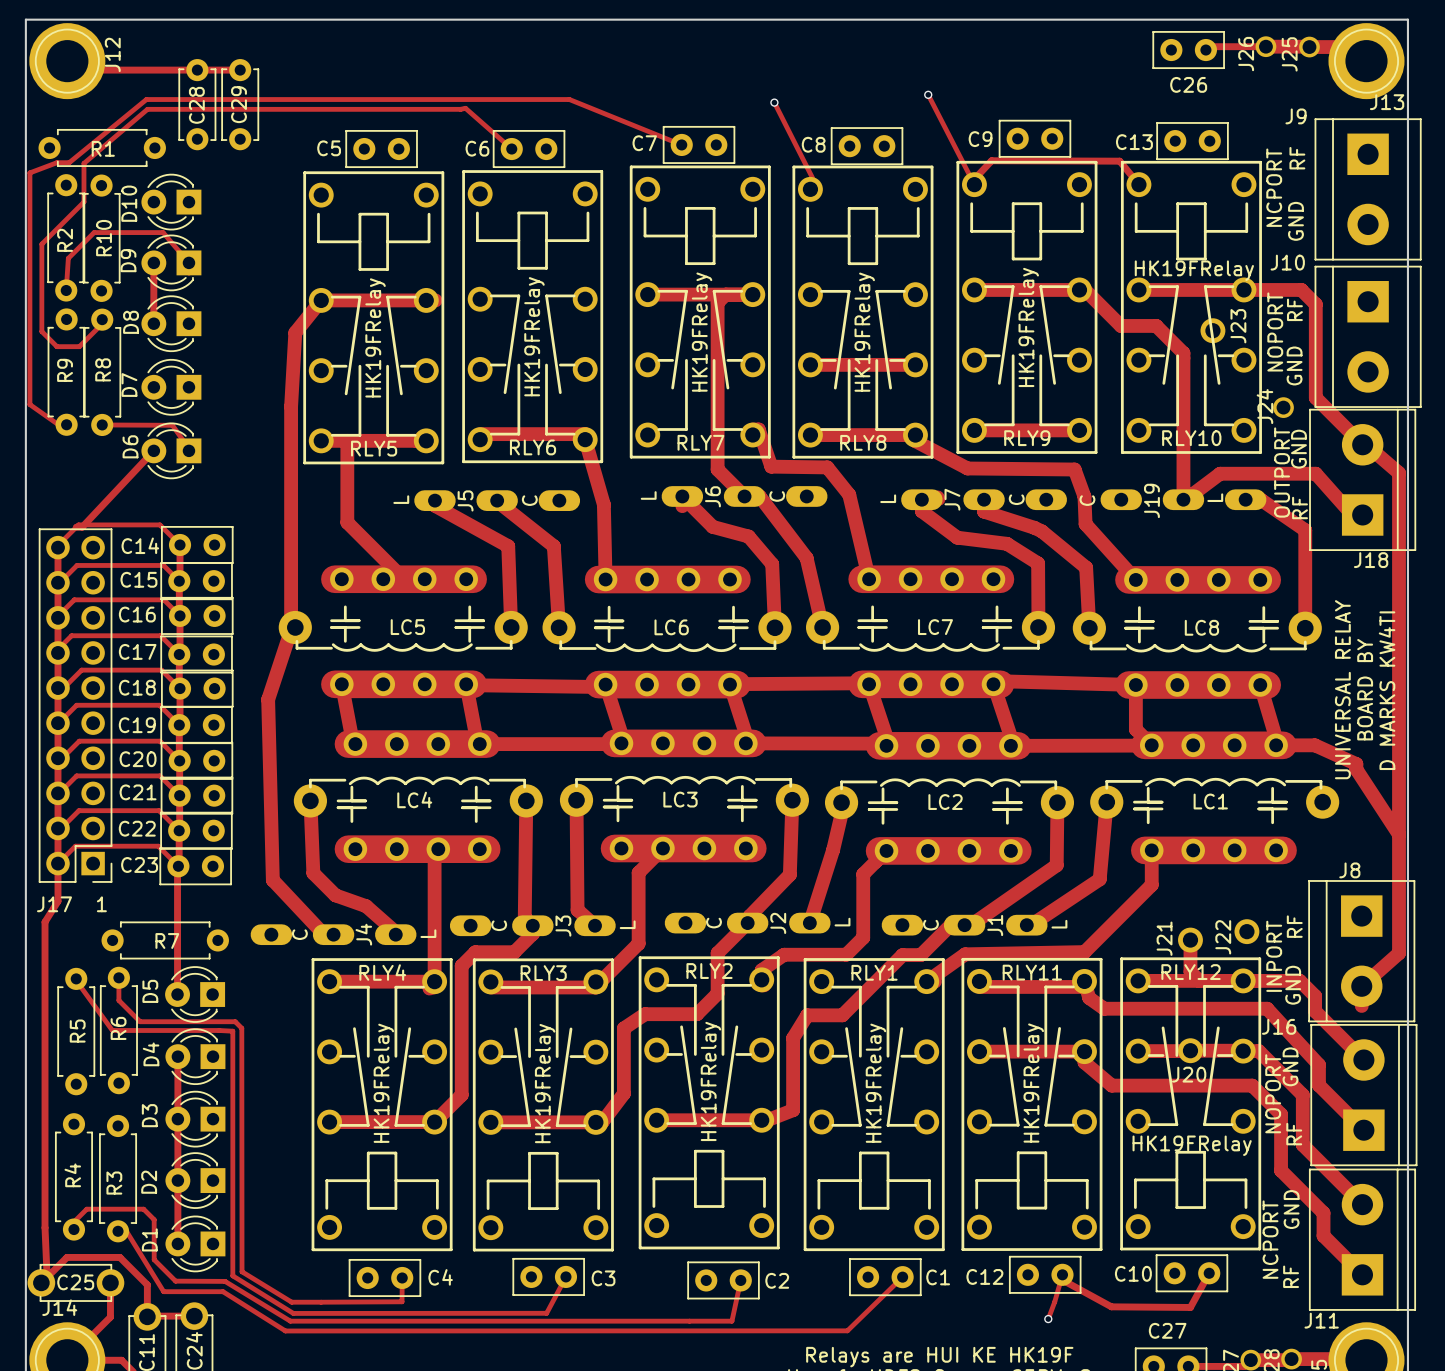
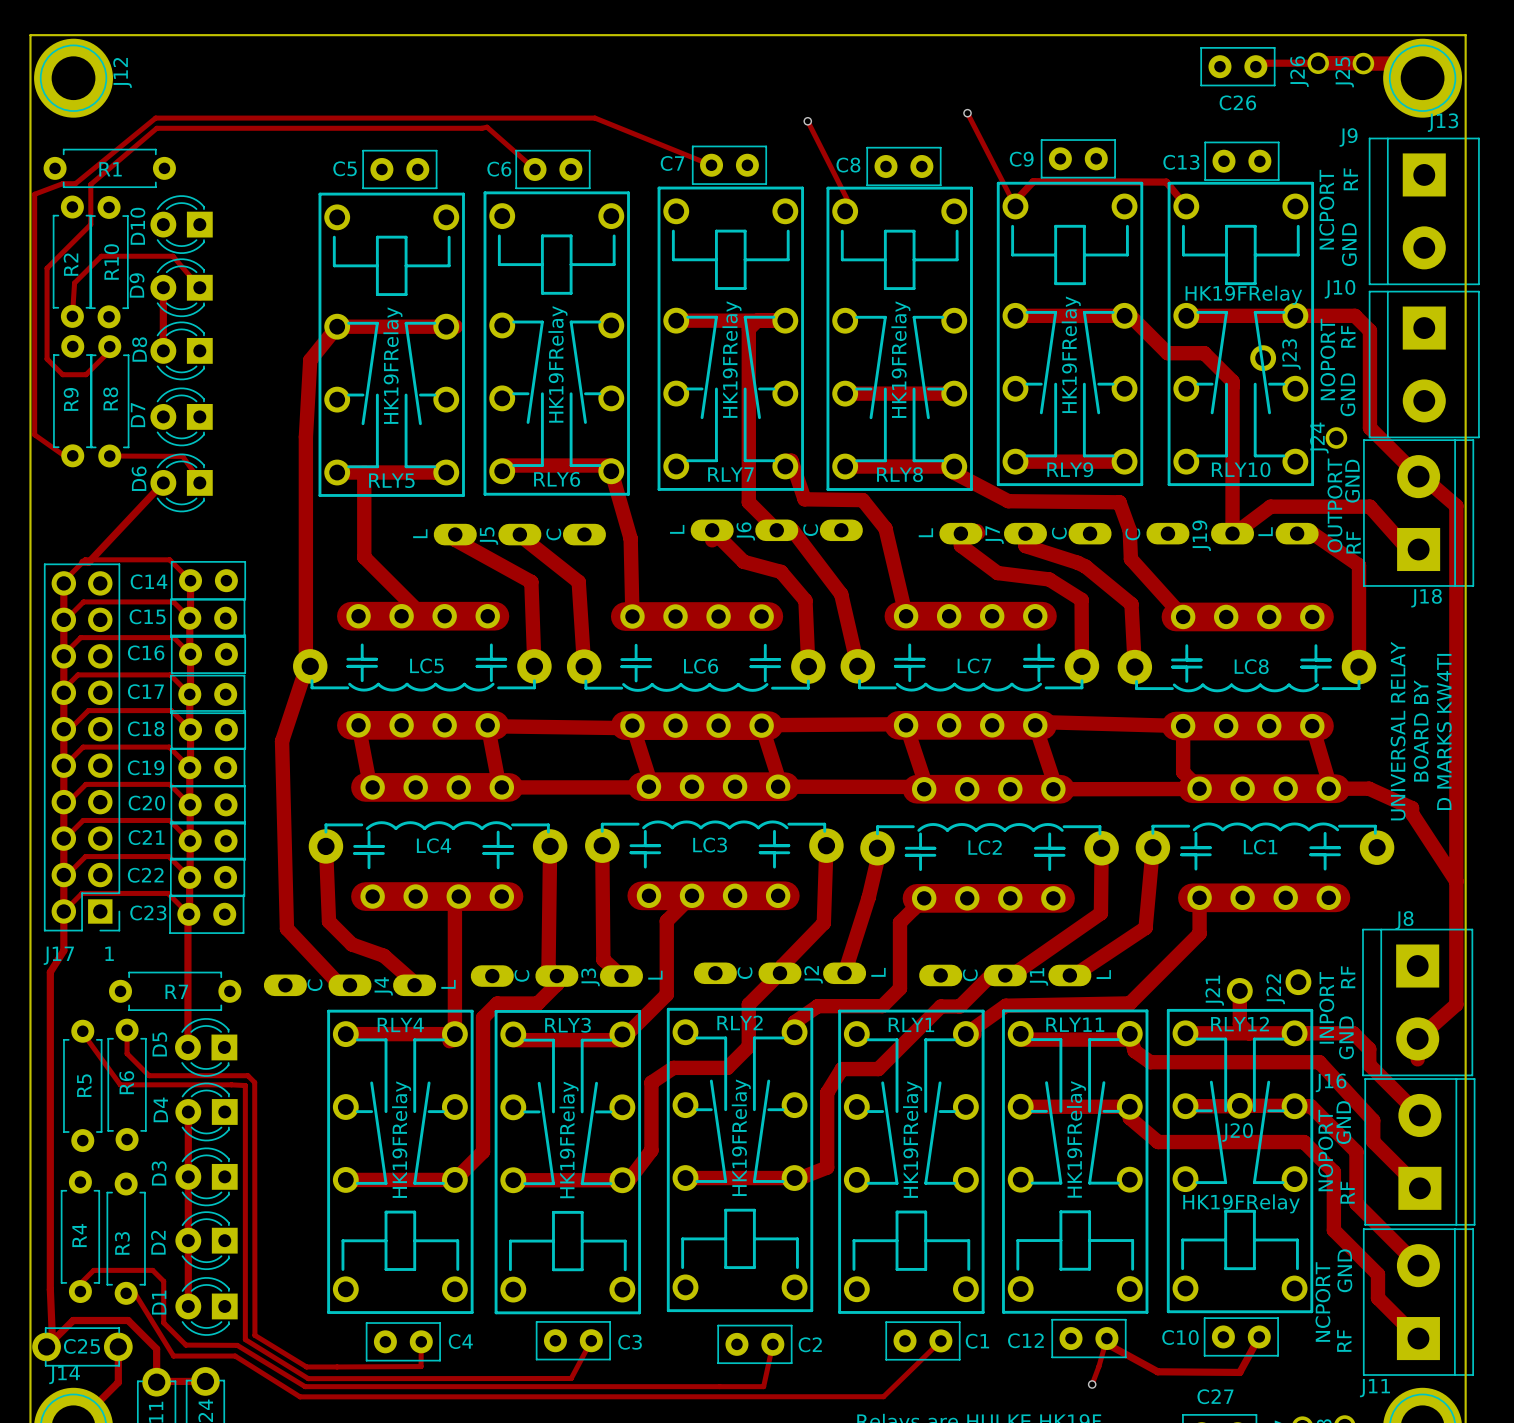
track: (67, 61) (76, 70) (240, 70) -> none
C28: (197, 104) -> none
C29: (240, 104) -> none

